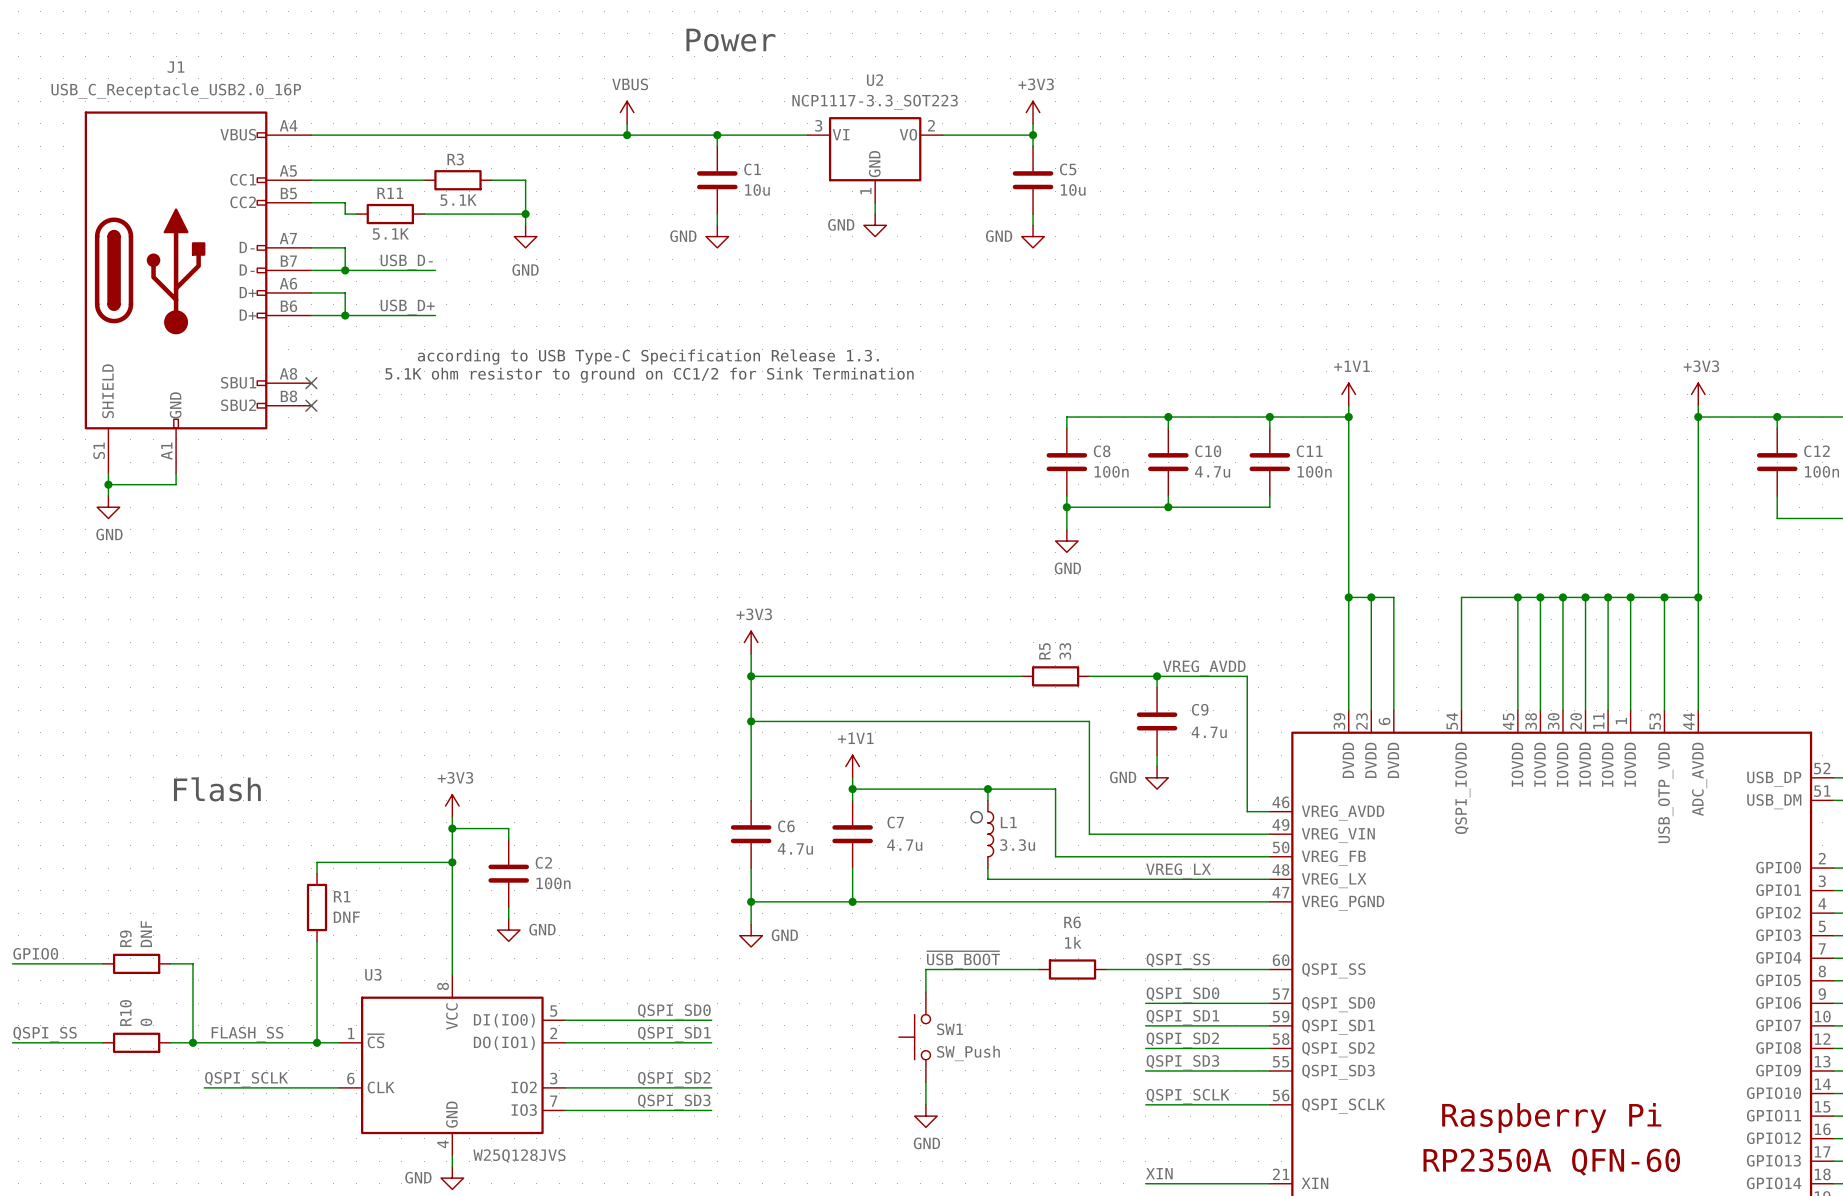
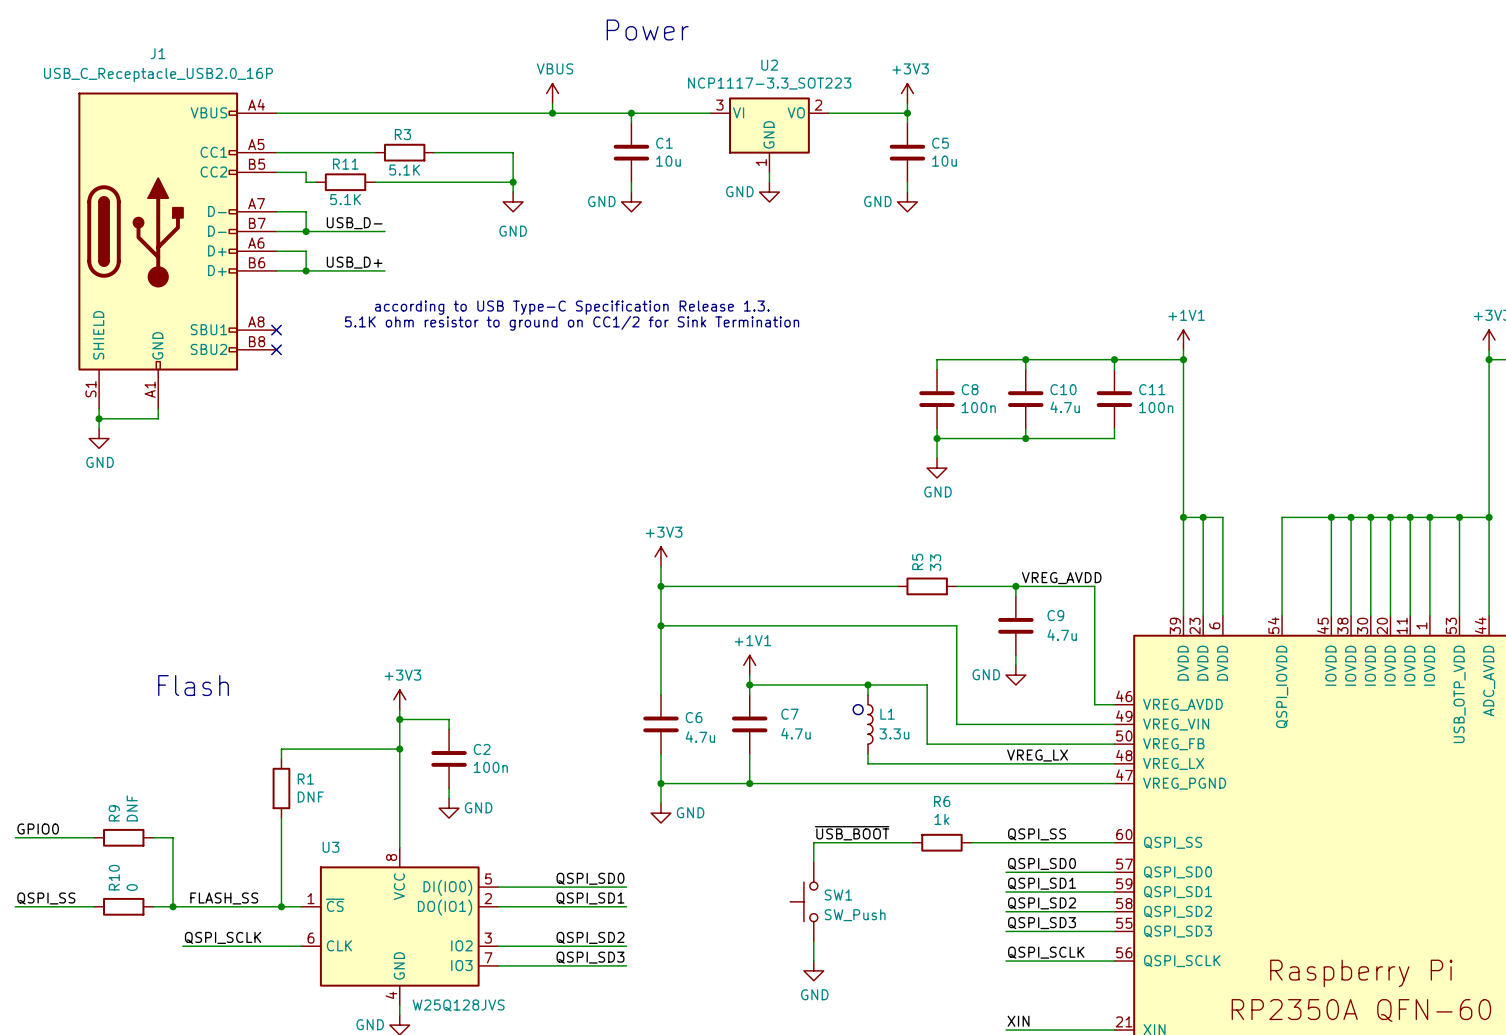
wire: (525, 180) (525, 225) -> (463, 152) (513, 152) (513, 192)
wire: none -> (463, 182) (513, 182)
junction: (525, 214) -> none
junction: none -> (513, 182)
power symbol position: GND (525, 236) -> GND (513, 201)

